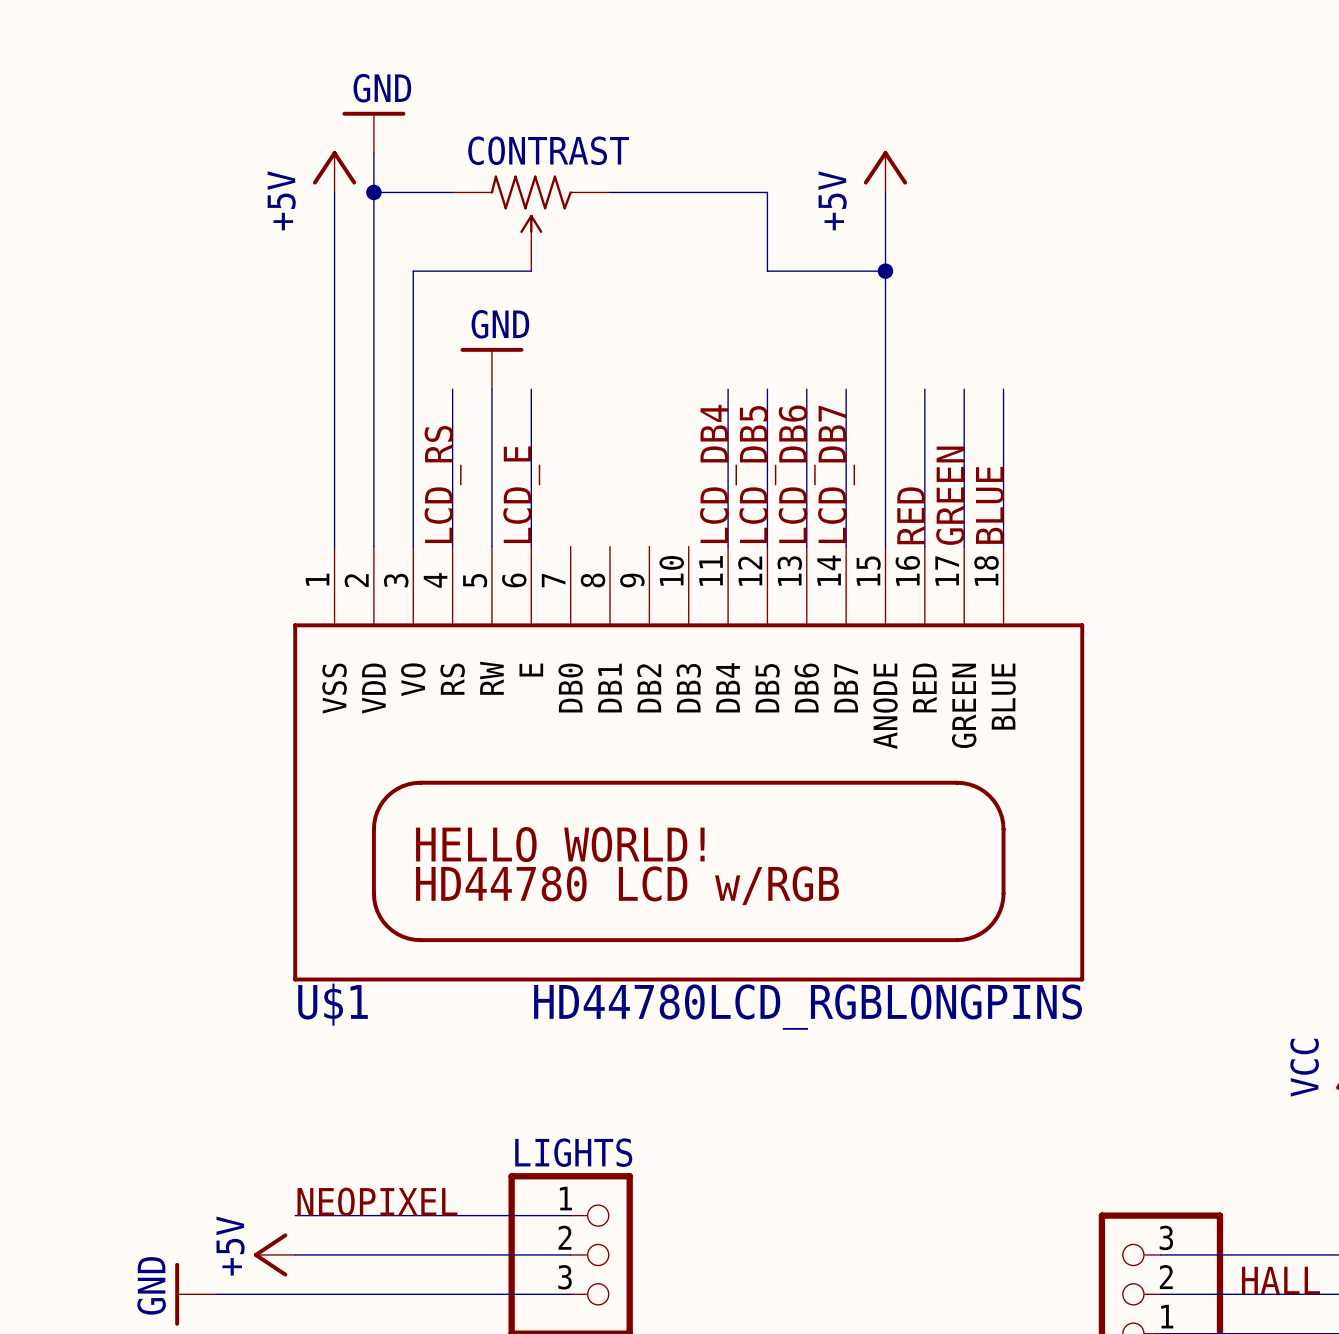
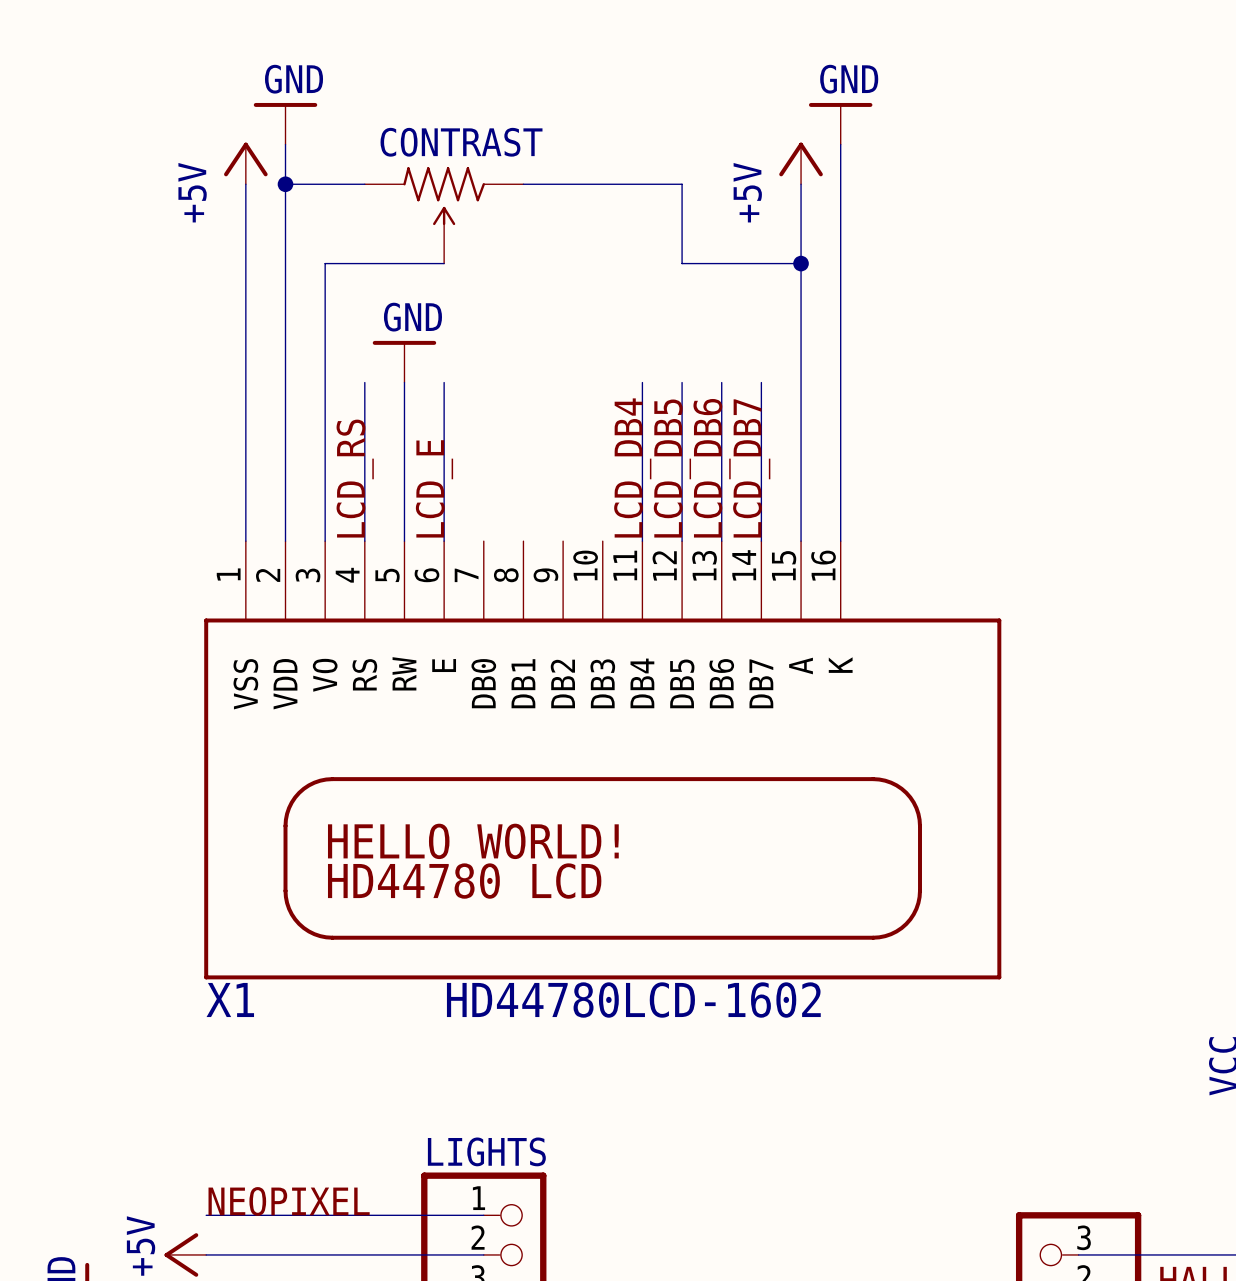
power symbol: none -> GND (840, 123)
wire: none -> (840, 144) (840, 382)
wire: (964, 389) (964, 546) -> none
wire: (1003, 389) (1003, 546) -> none
label: GREEN (950, 495) -> none
label: BLUE (990, 505) -> none
label: RED (911, 515) -> none
U$1: HD44780LCD_RGBLONGPINS (688, 764) -> none
X1: none -> HD44780LCD-1602 (602, 760)

